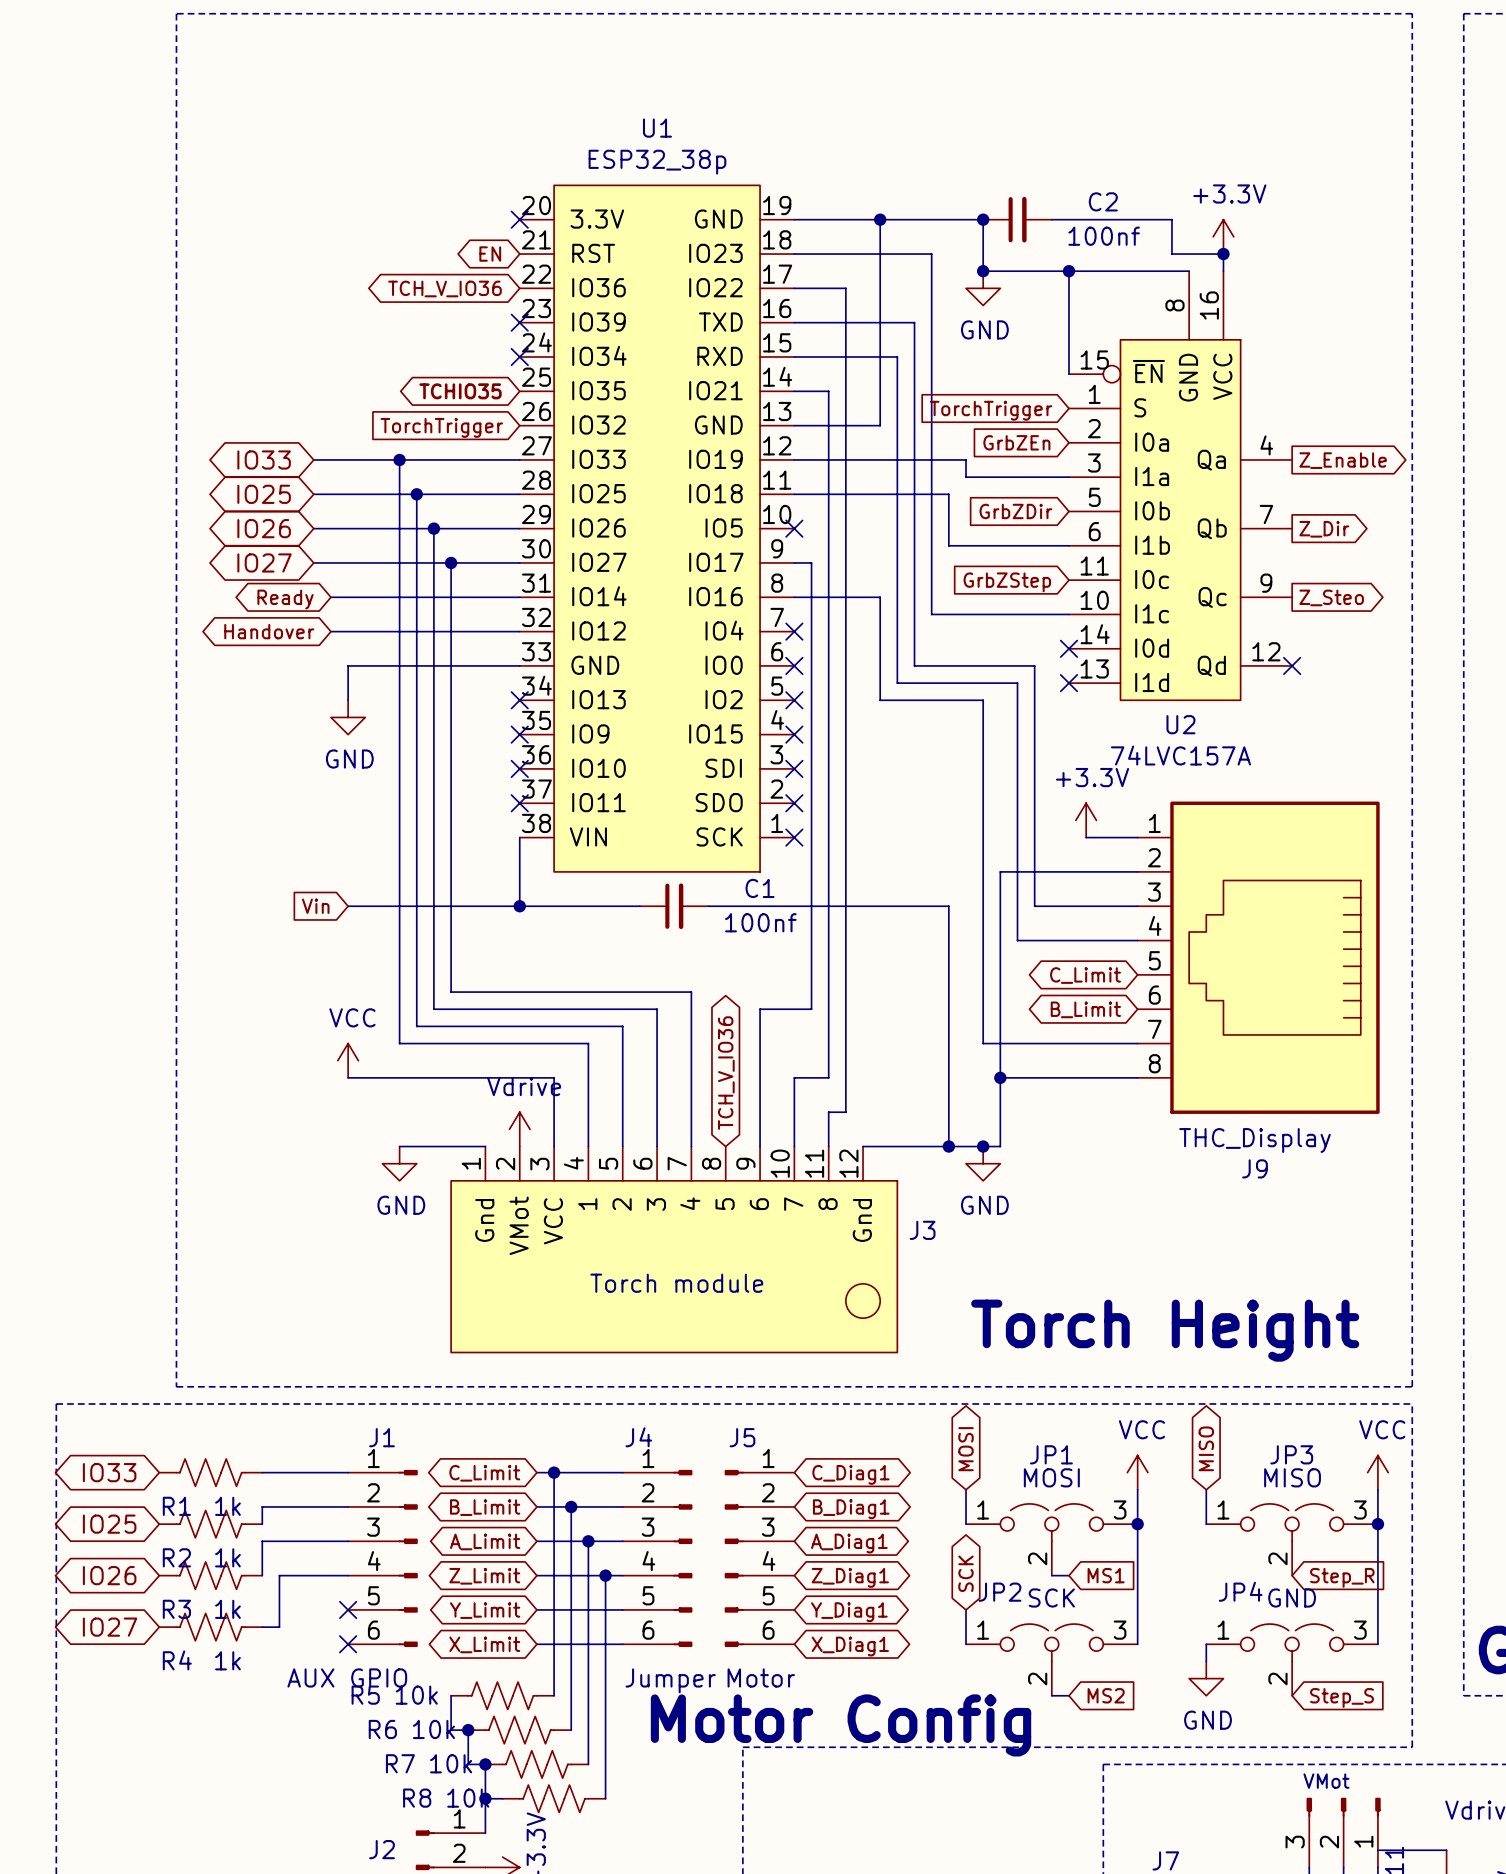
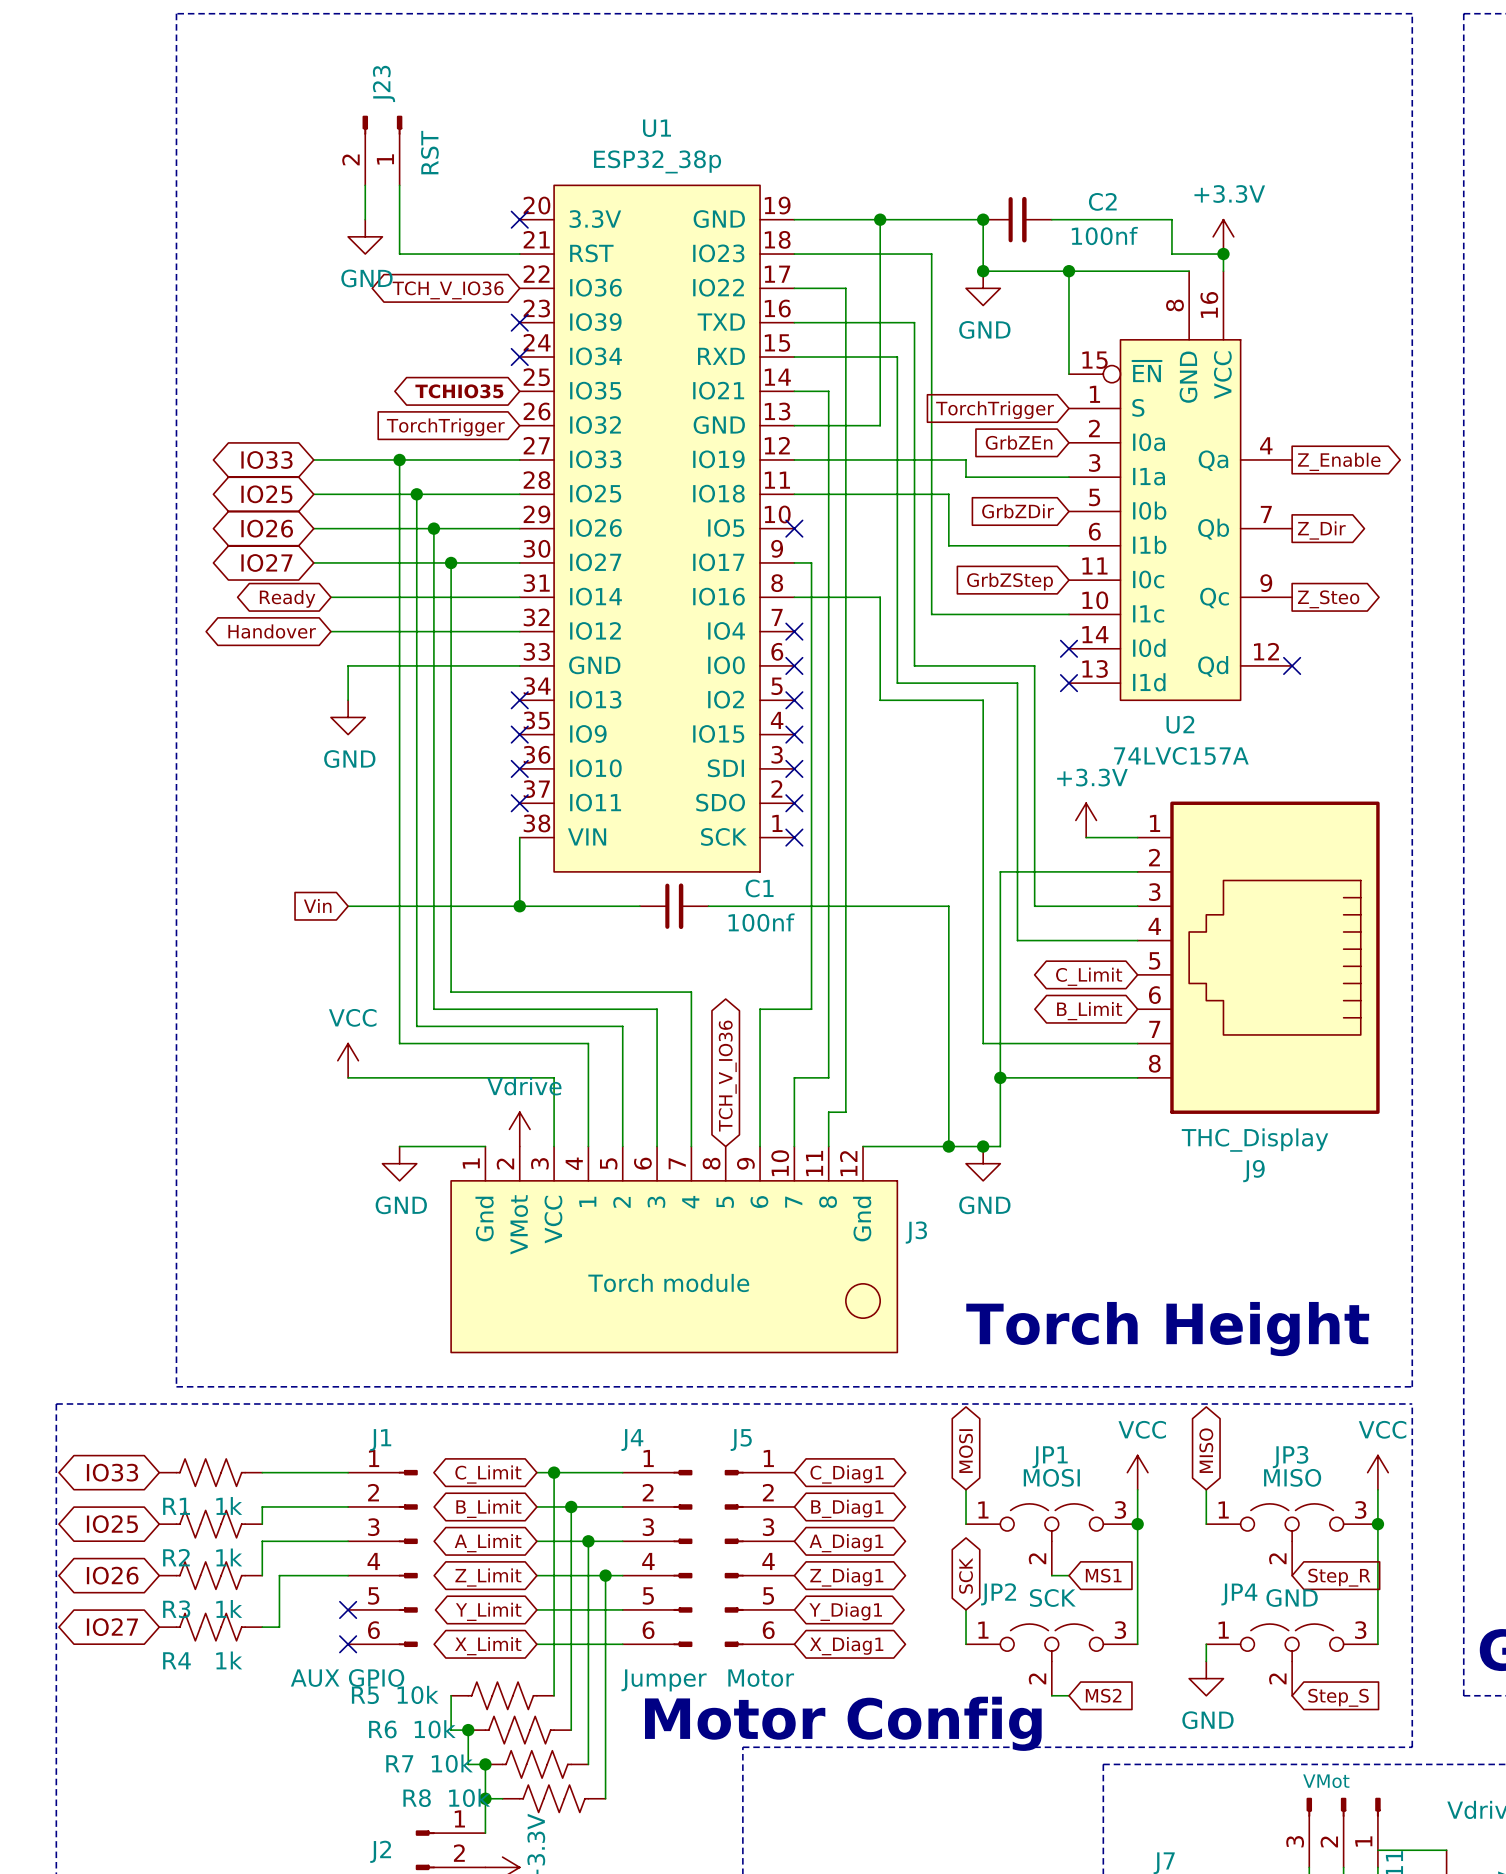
J23: none -> RST (382, 150)
wire: none -> (365, 185) (365, 219)
wire: none -> (399, 185) (399, 254) (519, 254)
power symbol: none -> GND (365, 236)
global label: EN (490, 254) -> none

